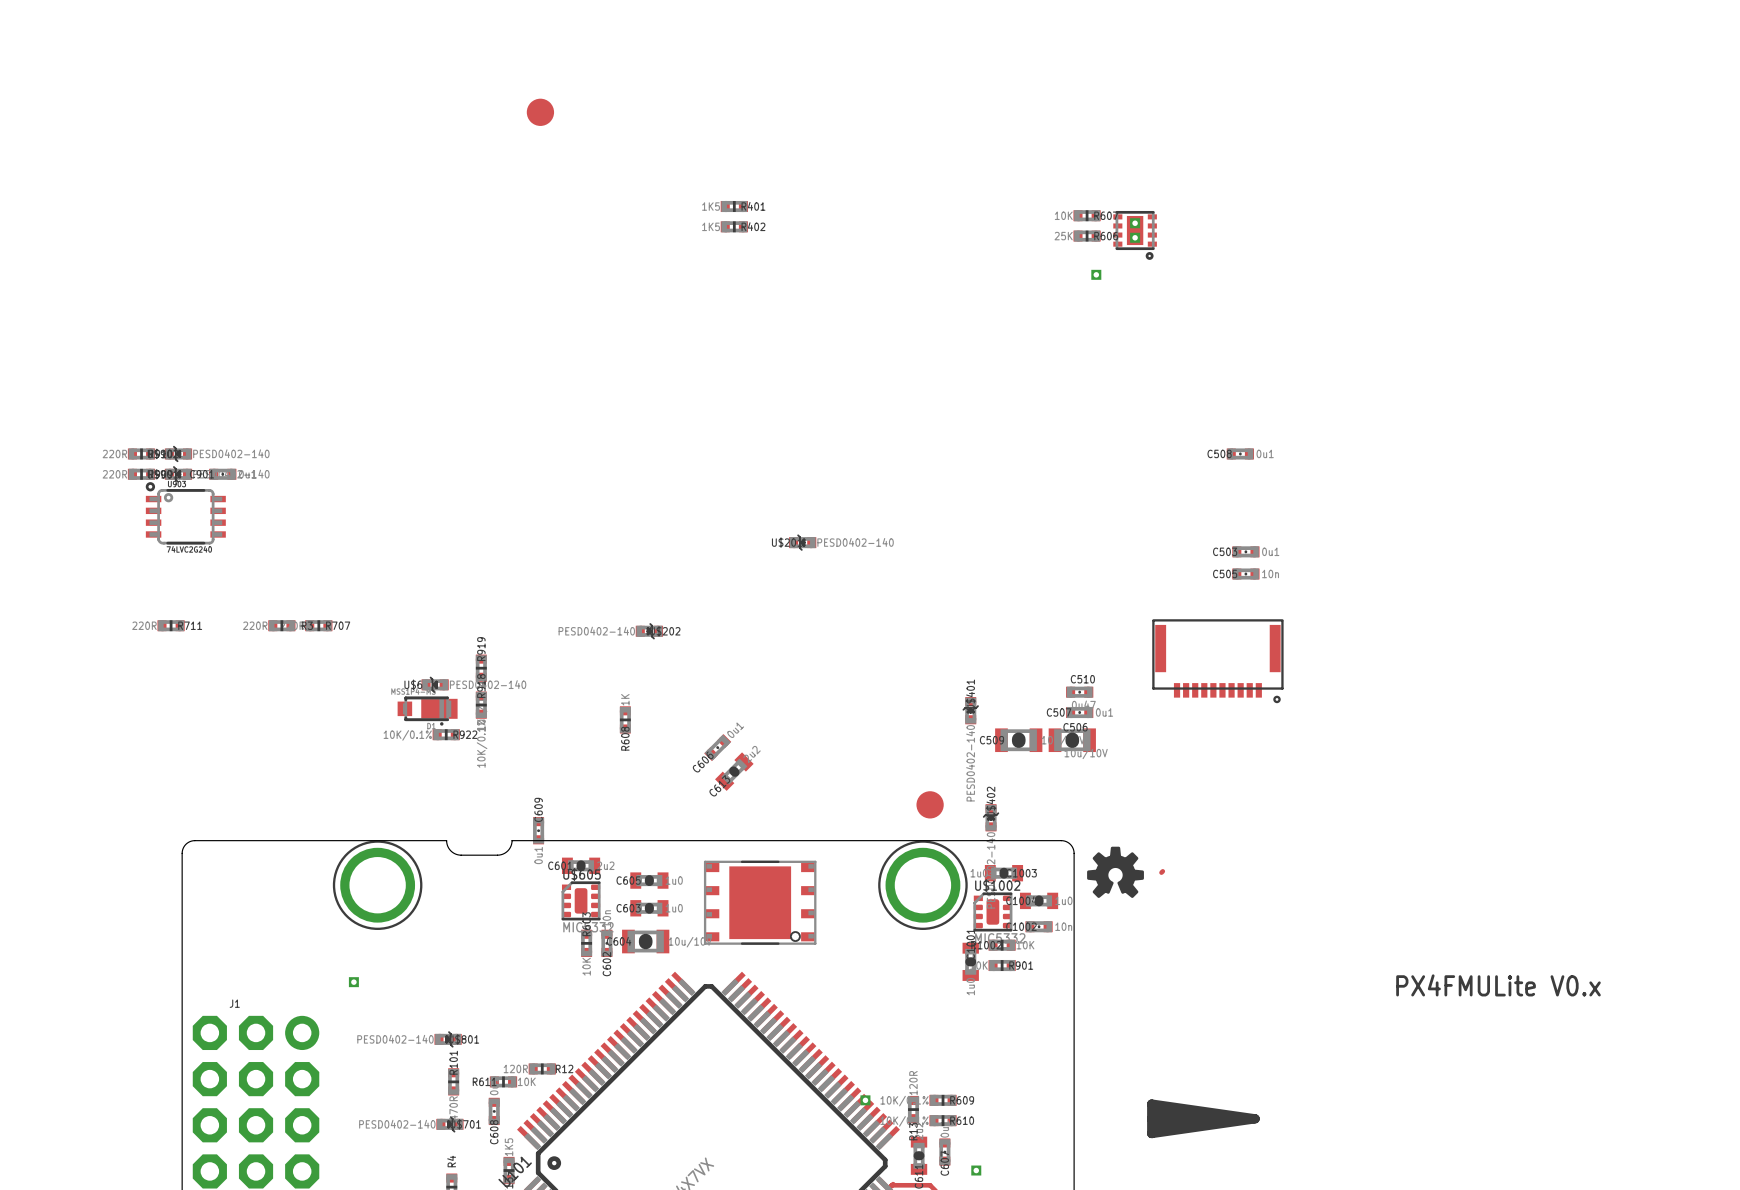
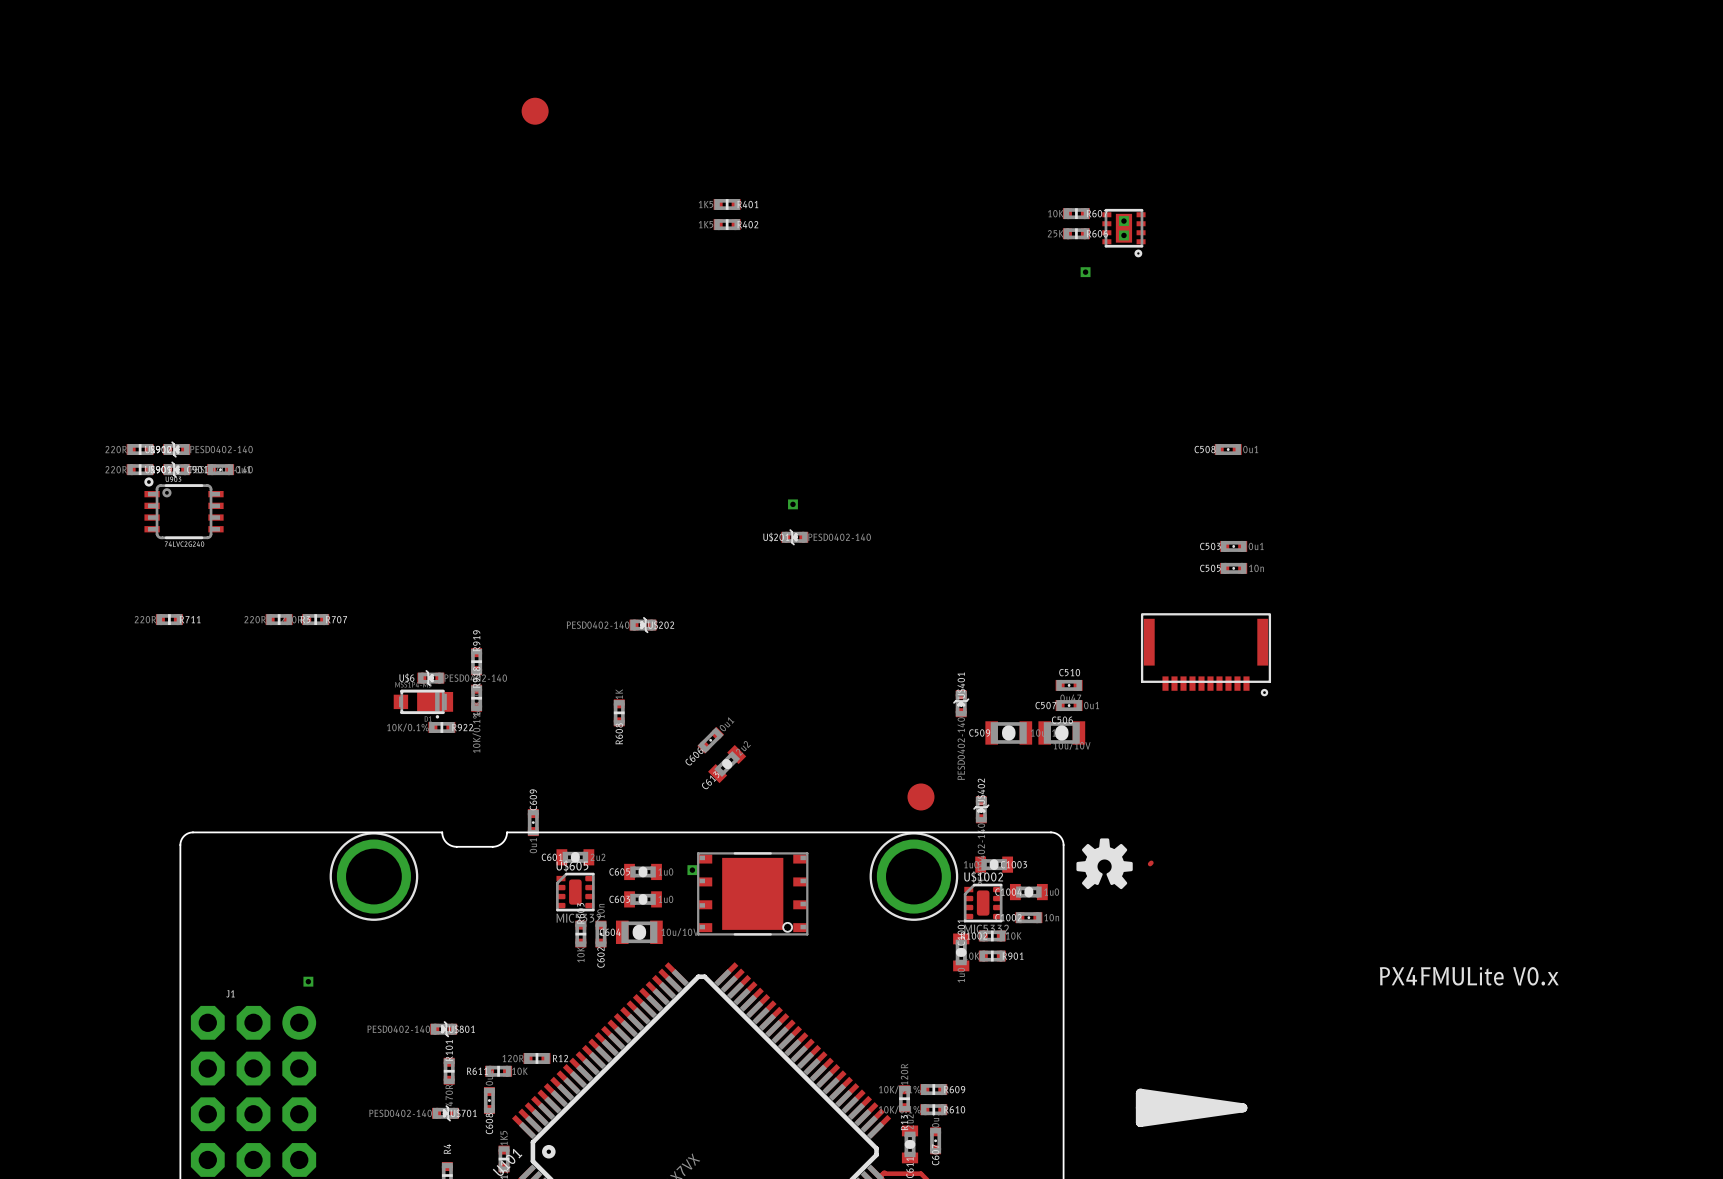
part: none -> (792, 504)
part: none -> (692, 870)
part position: (353, 982) -> (308, 981)
part: (865, 1100) -> none
part: (976, 1170) -> none

